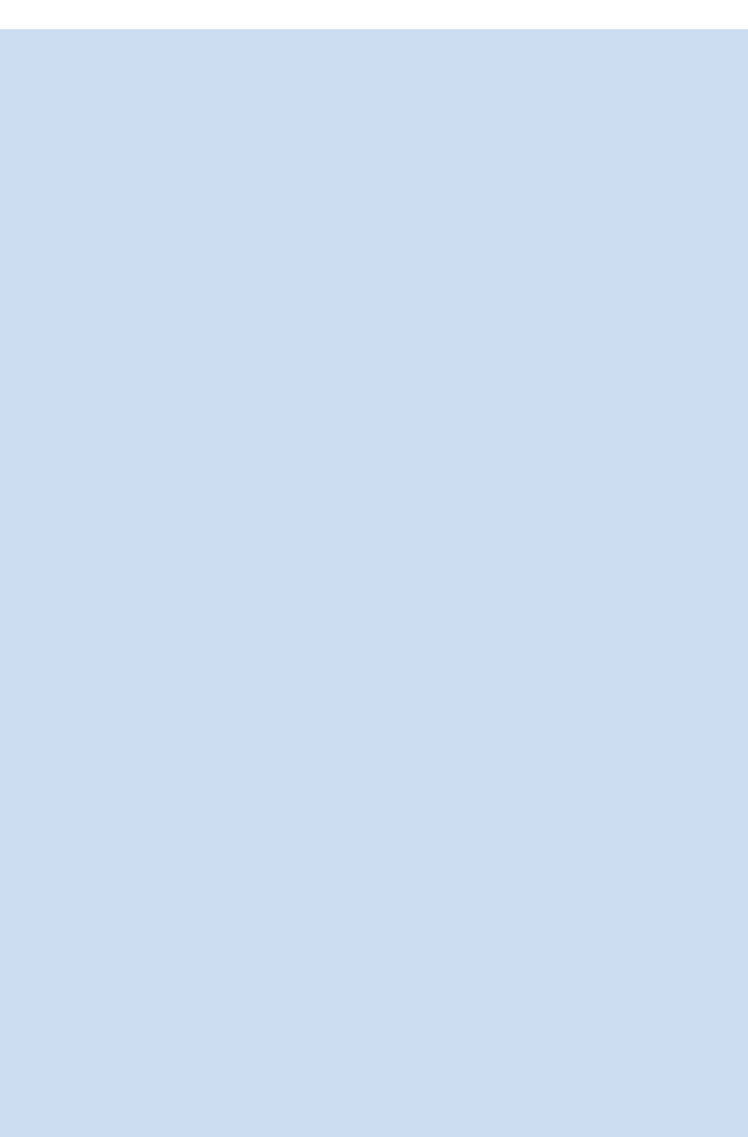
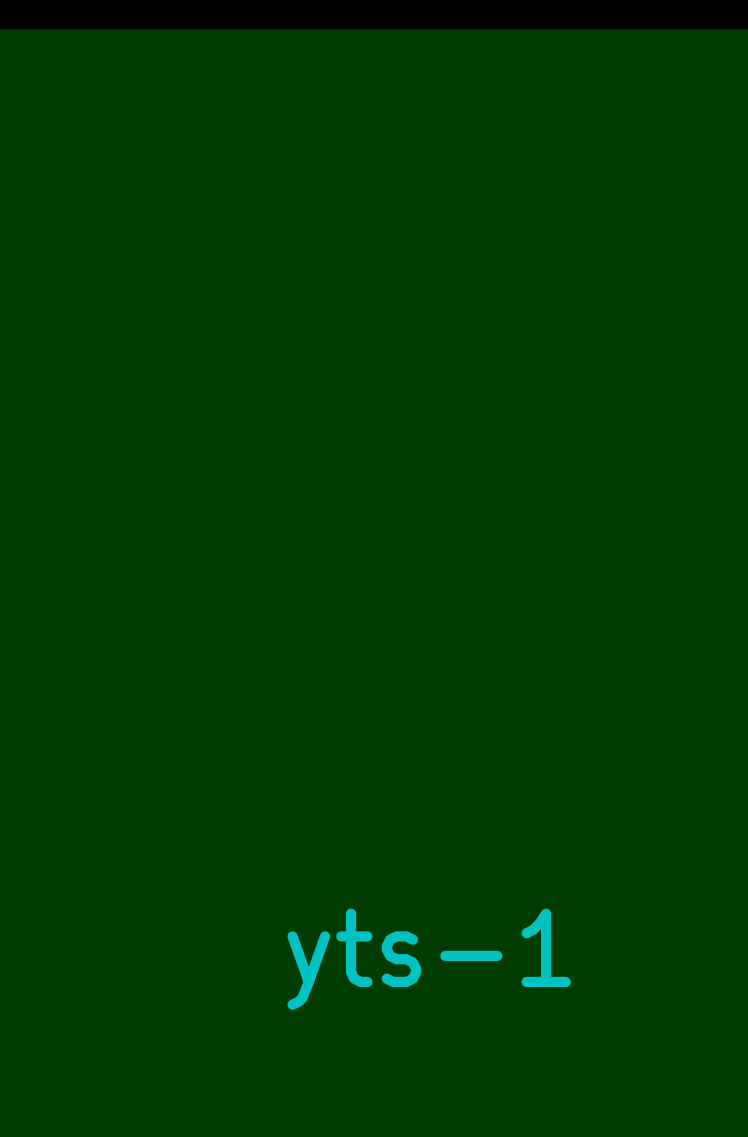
text: none -> yts-1 (429, 959)

